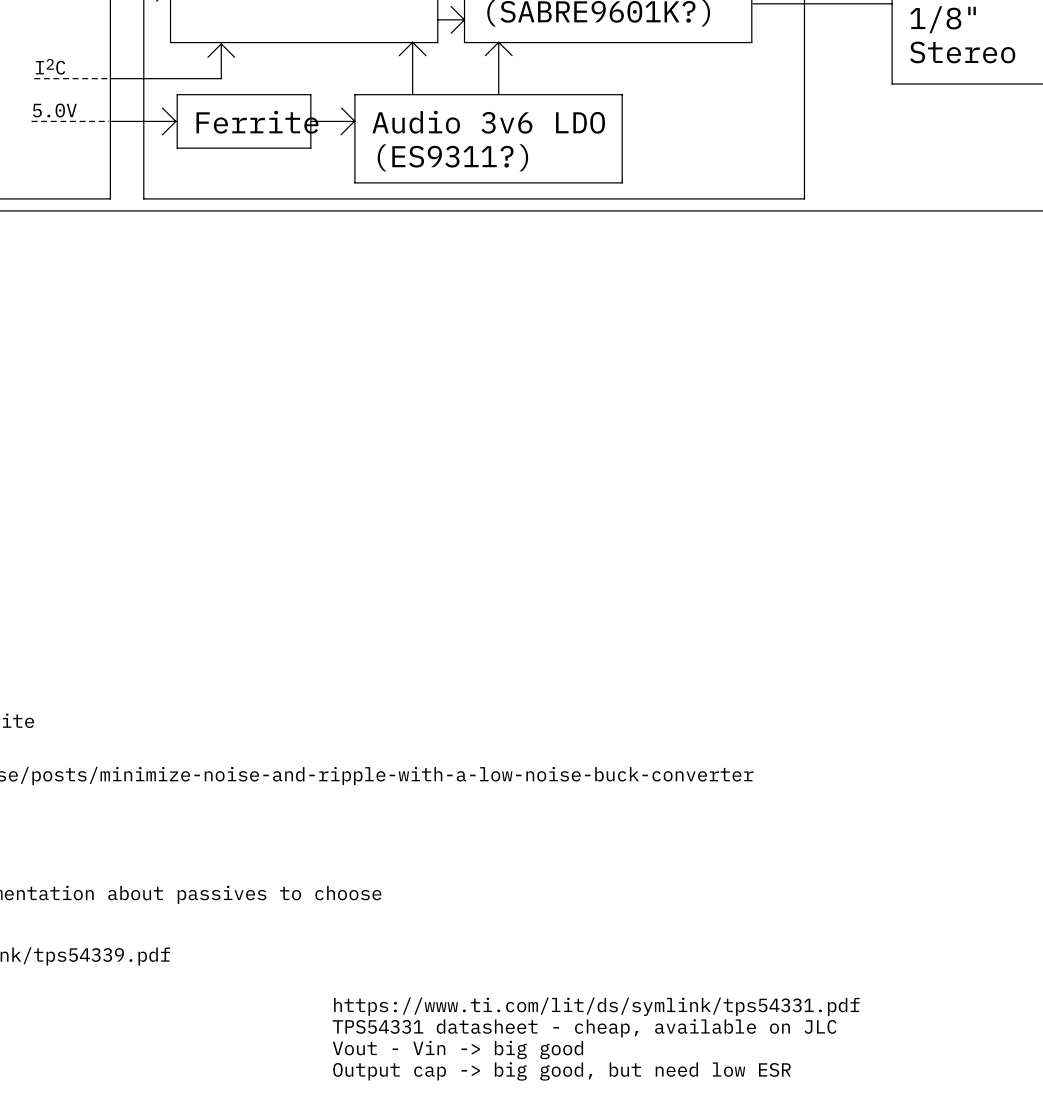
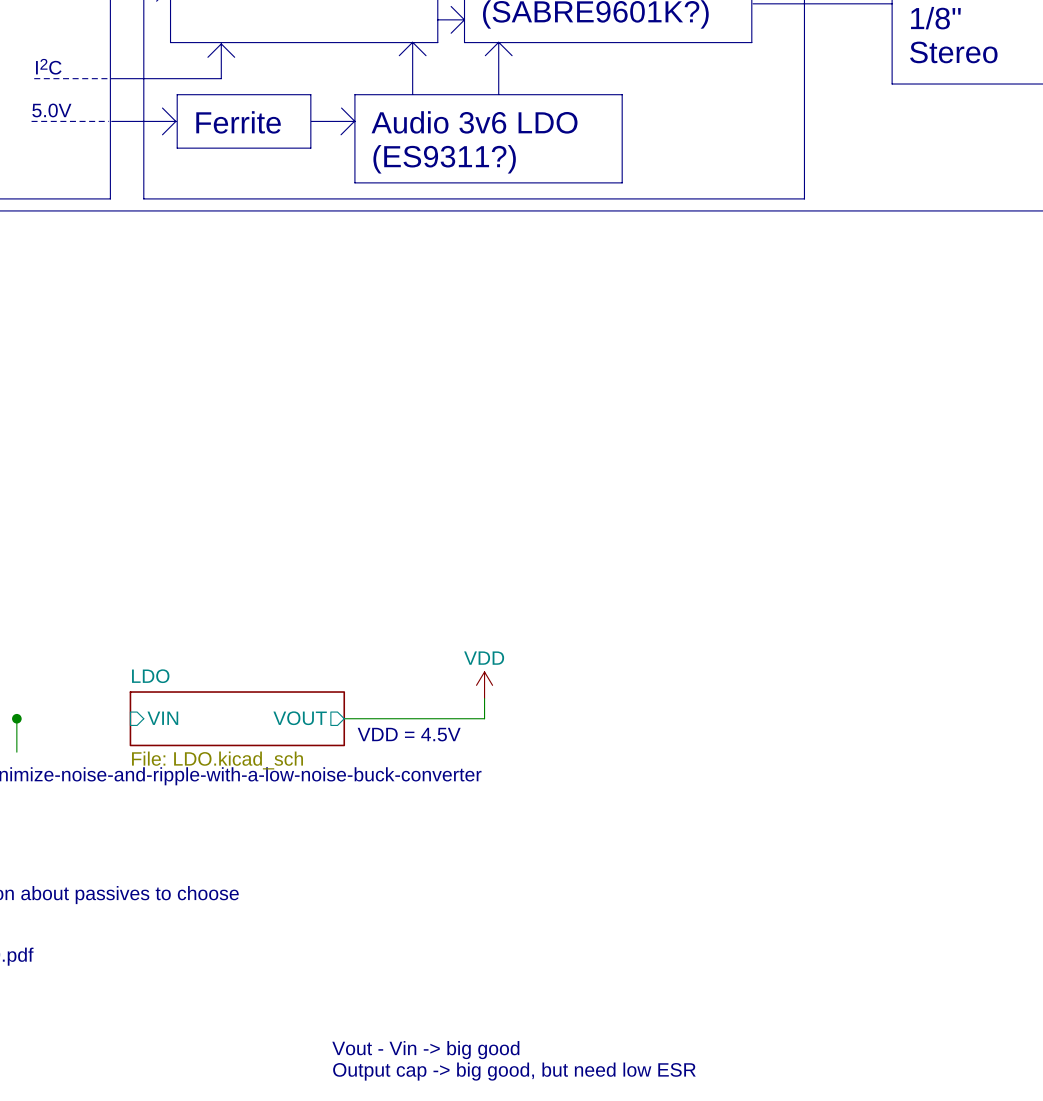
power symbol: none -> VDD (484, 685)
wire: none -> (484, 698) (484, 718) (344, 718)
wire: none -> (16, 718) (16, 752)
junction: none -> (16, 718)
sheet pin: none -> VIN (162, 718)
sheet LDO: none -> File: LDO.kicad_sch (237, 718)
sheet pin: none -> VOUT (300, 718)
text: none -> VDD = 4.5V (409, 734)
text: https://www.ti.com/lit/ds/symlink/tps54331.pdf (596, 1006) -> none
text: TPS54331 datasheet - cheap, available on JLC (584, 1028) -> none

